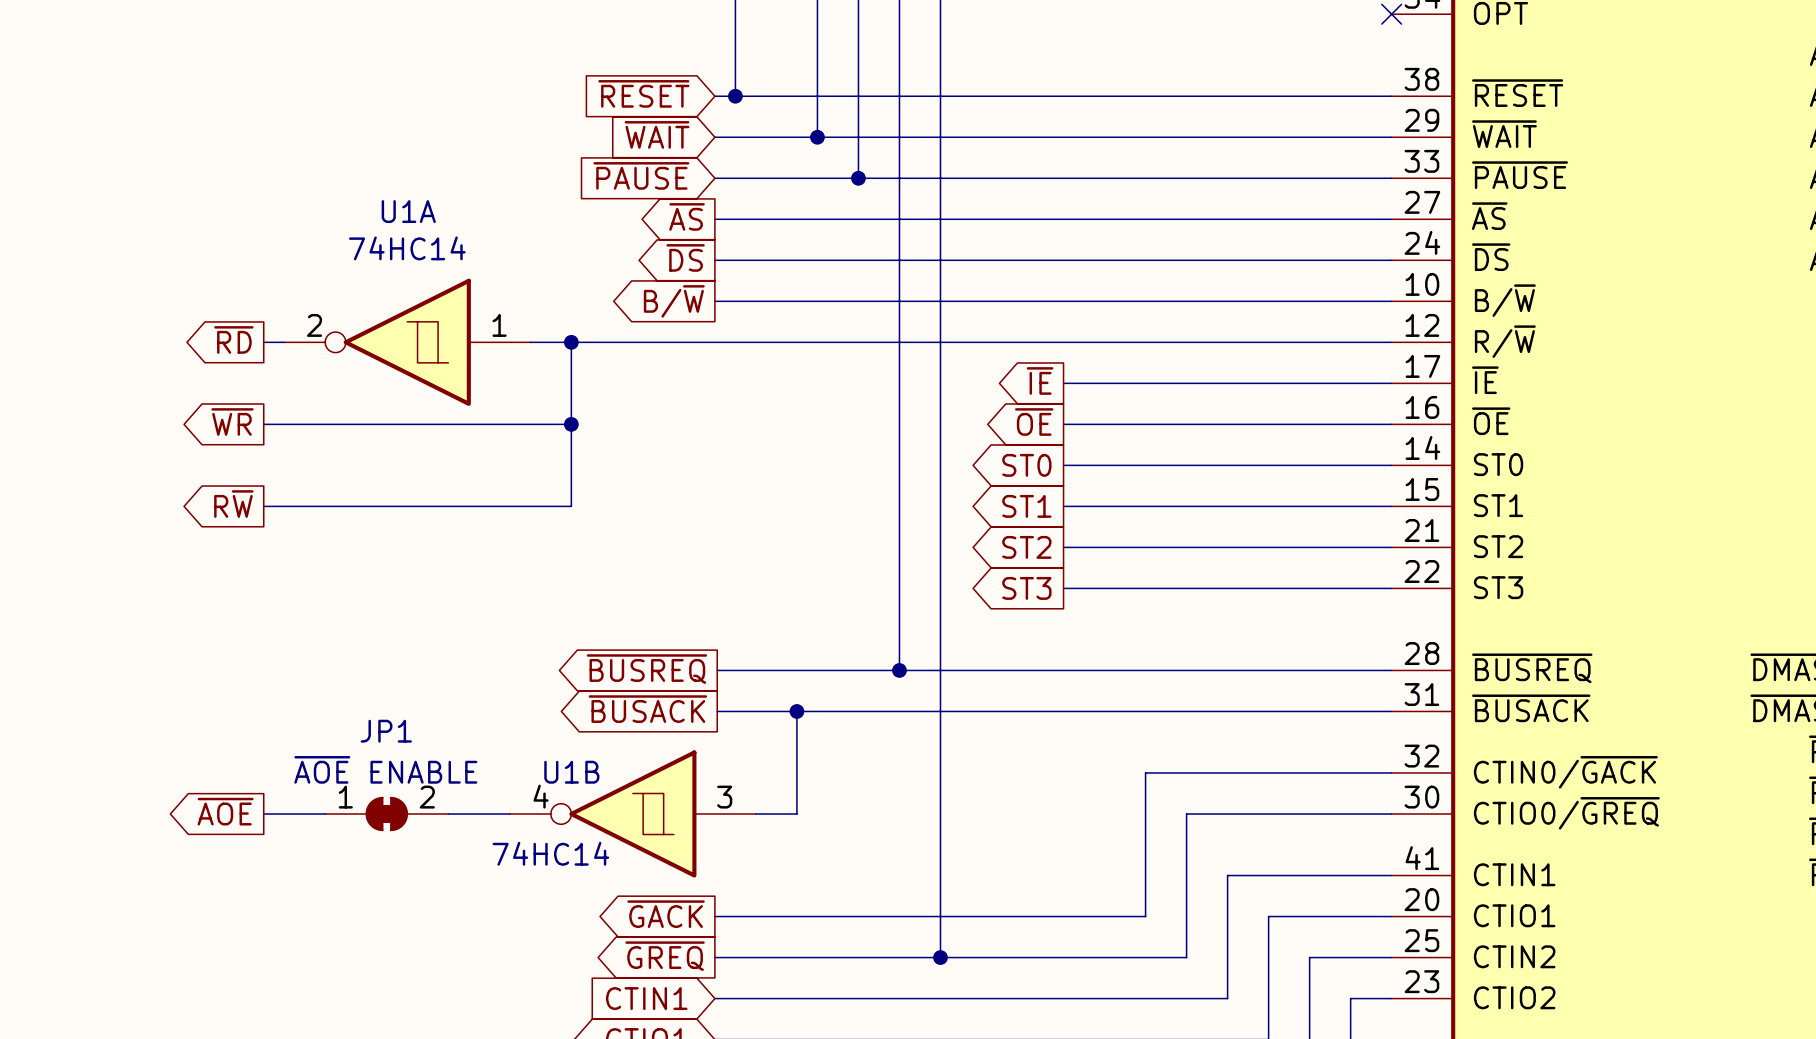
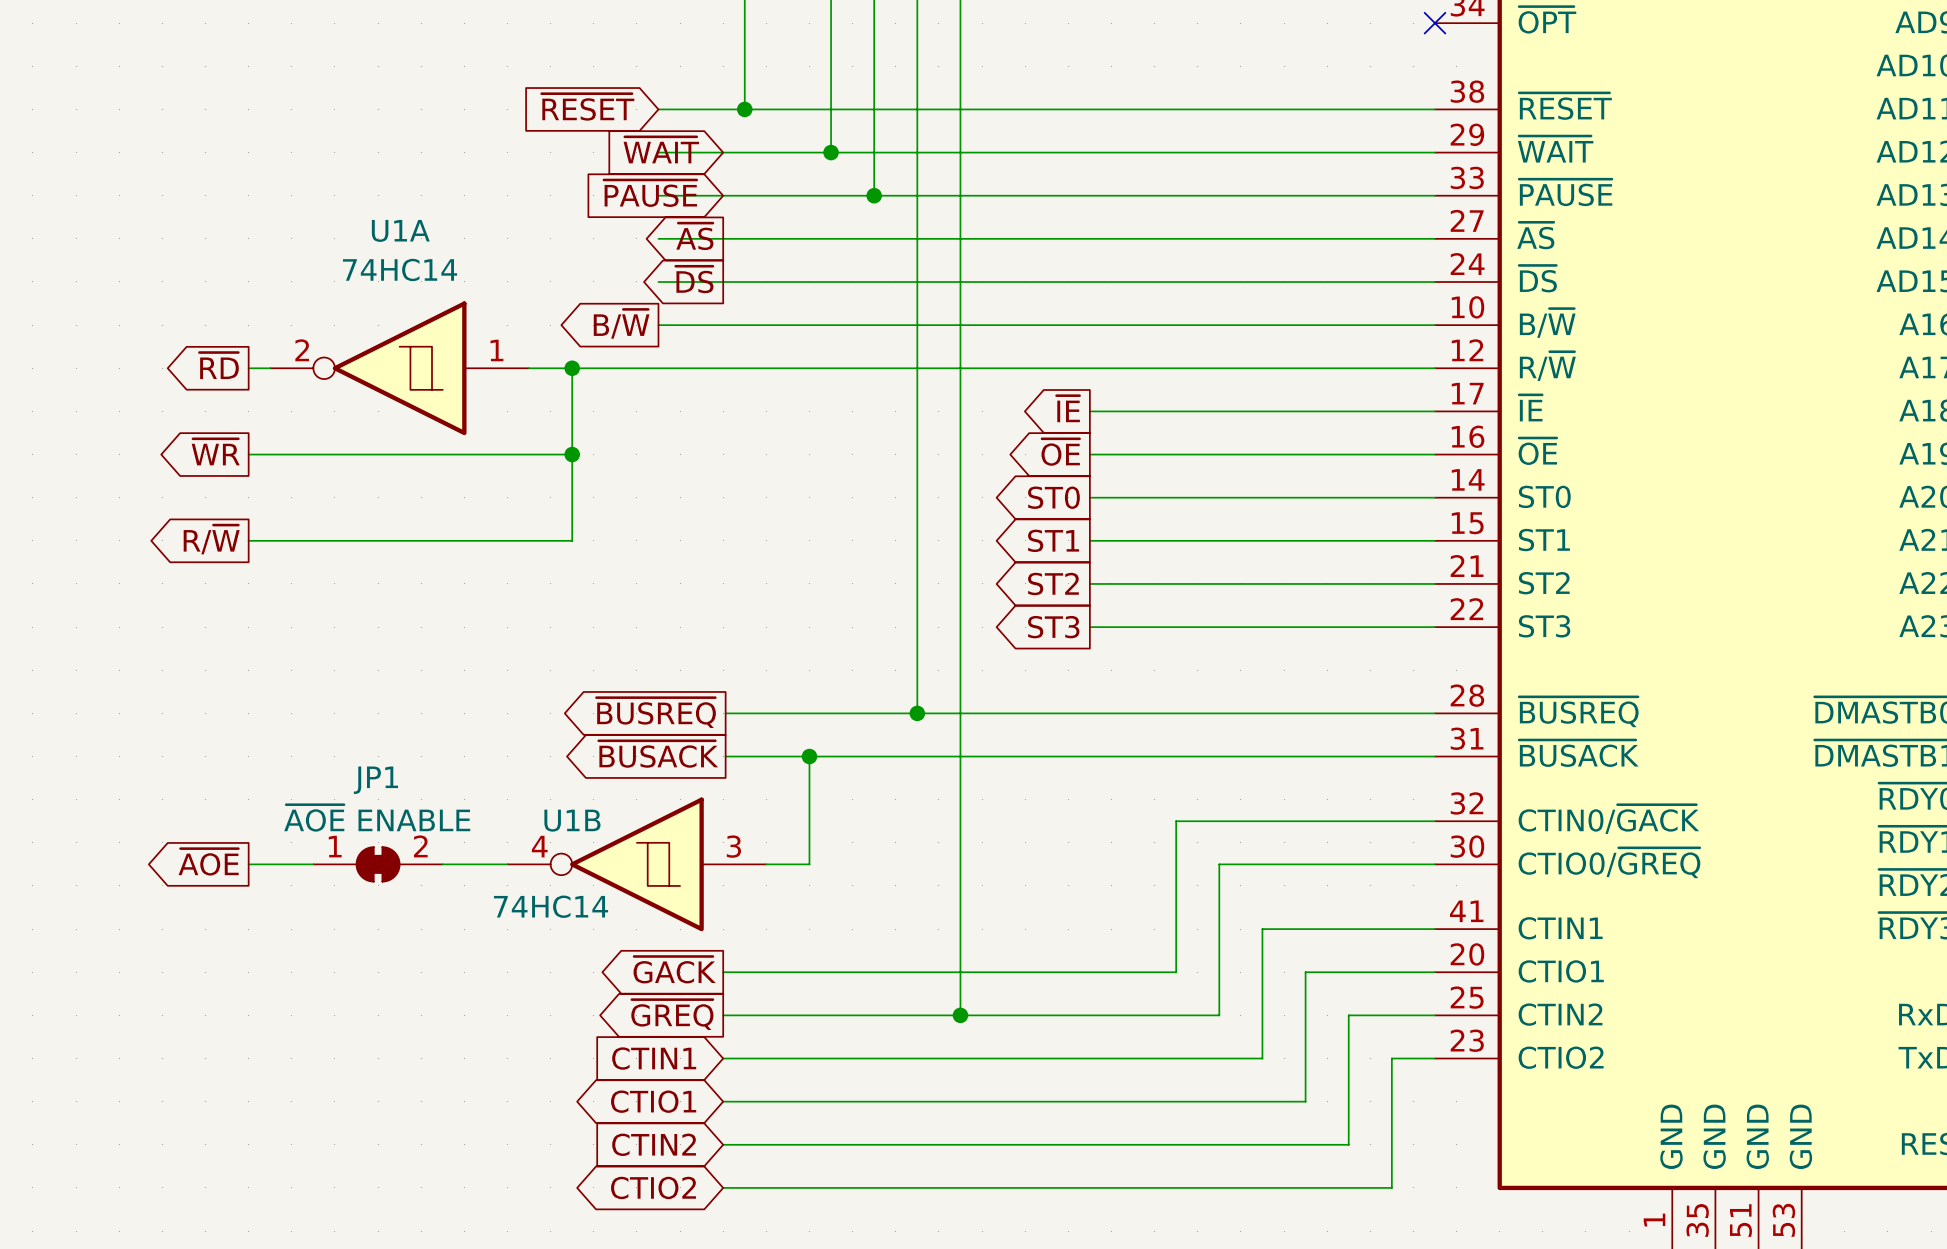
global label position: ~{RESET} (643, 93) -> ~{RESET} (587, 107)
wire: none -> (658, 109) (723, 109)
wire: none -> (658, 152) (723, 152)
wire: none -> (658, 195) (723, 195)
wire: none -> (658, 238) (723, 238)
wire: none -> (658, 281) (723, 281)
wire: none -> (658, 325) (723, 325)
global label position: B/~{W} (674, 301) -> B/~{W} (621, 324)
global label: R~{W} (233, 504) -> R/~{W} (211, 539)

